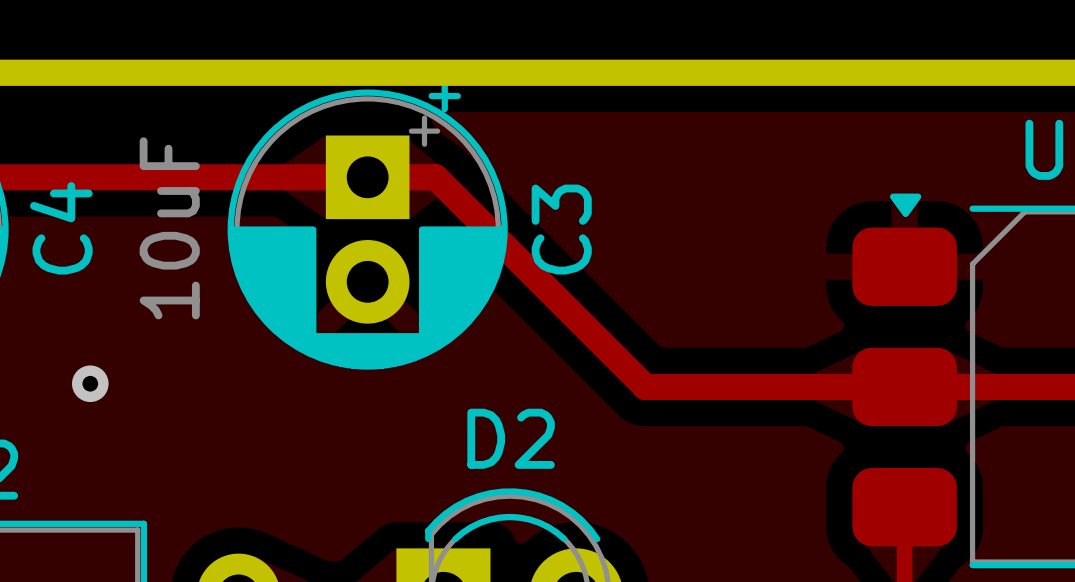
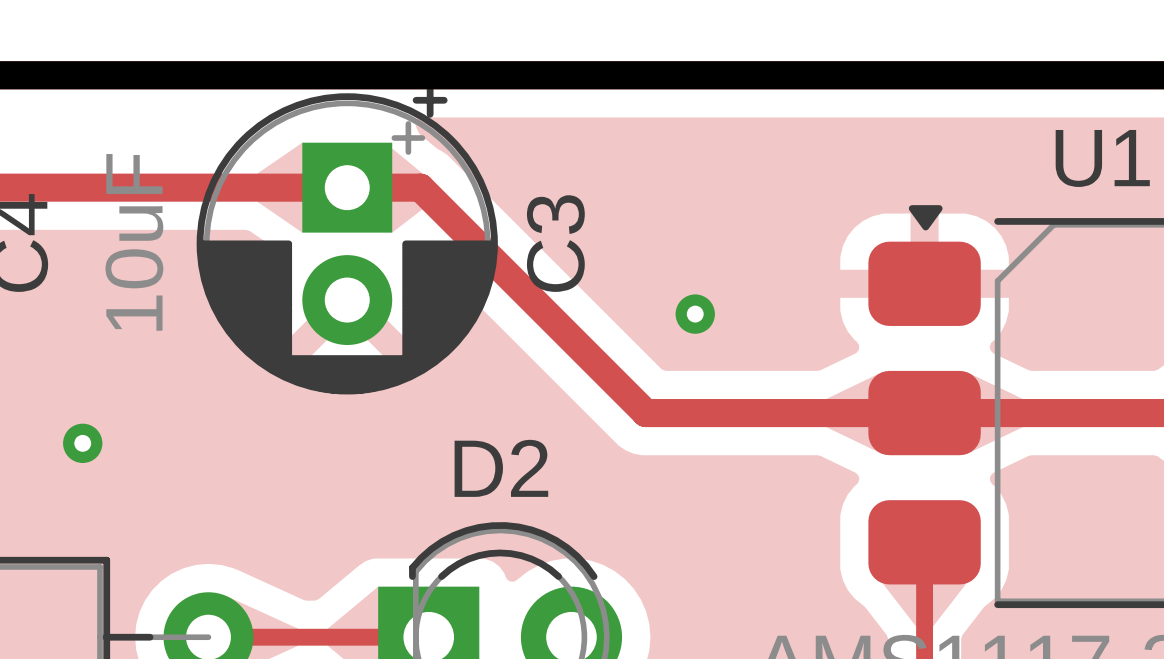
via: none -> (695, 314)
via position: (90, 383) -> (82, 443)

